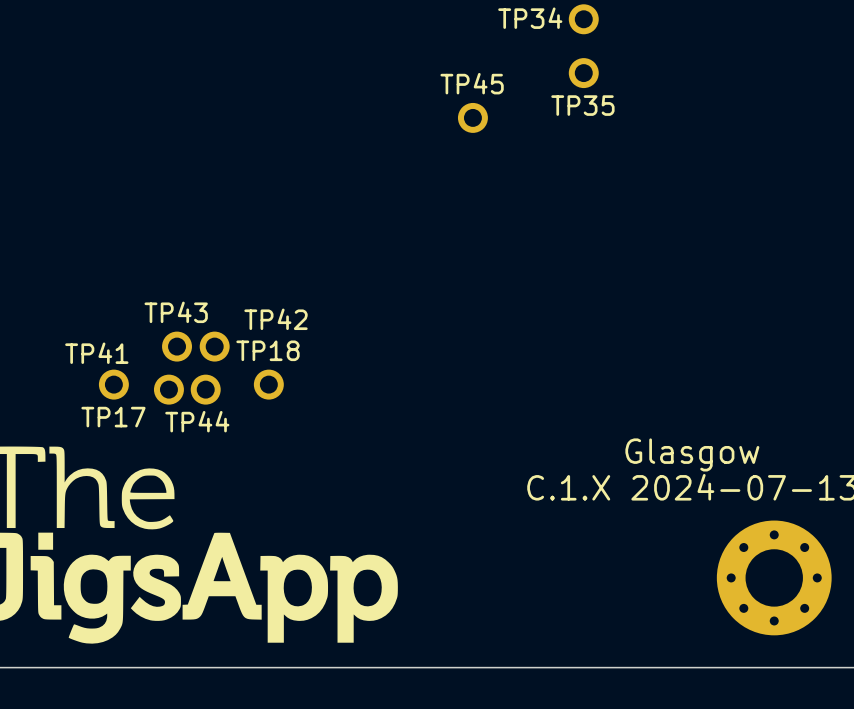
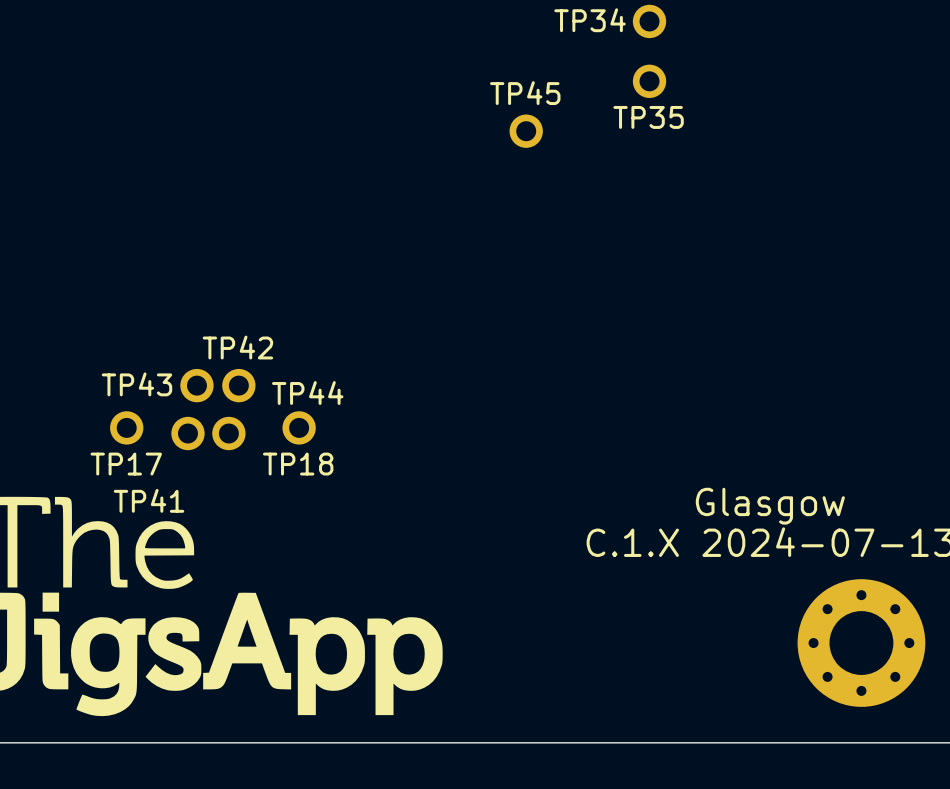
TP43 name position: TP43 (176, 312) -> TP43 (136, 384)
TP42 name position: TP42 (276, 319) -> TP42 (237, 347)
TP18 name position: TP18 (267, 350) -> TP18 (298, 464)
TP41 name position: TP41 (96, 353) -> TP41 (149, 500)
TP44 name position: TP44 (197, 421) -> TP44 (307, 393)

